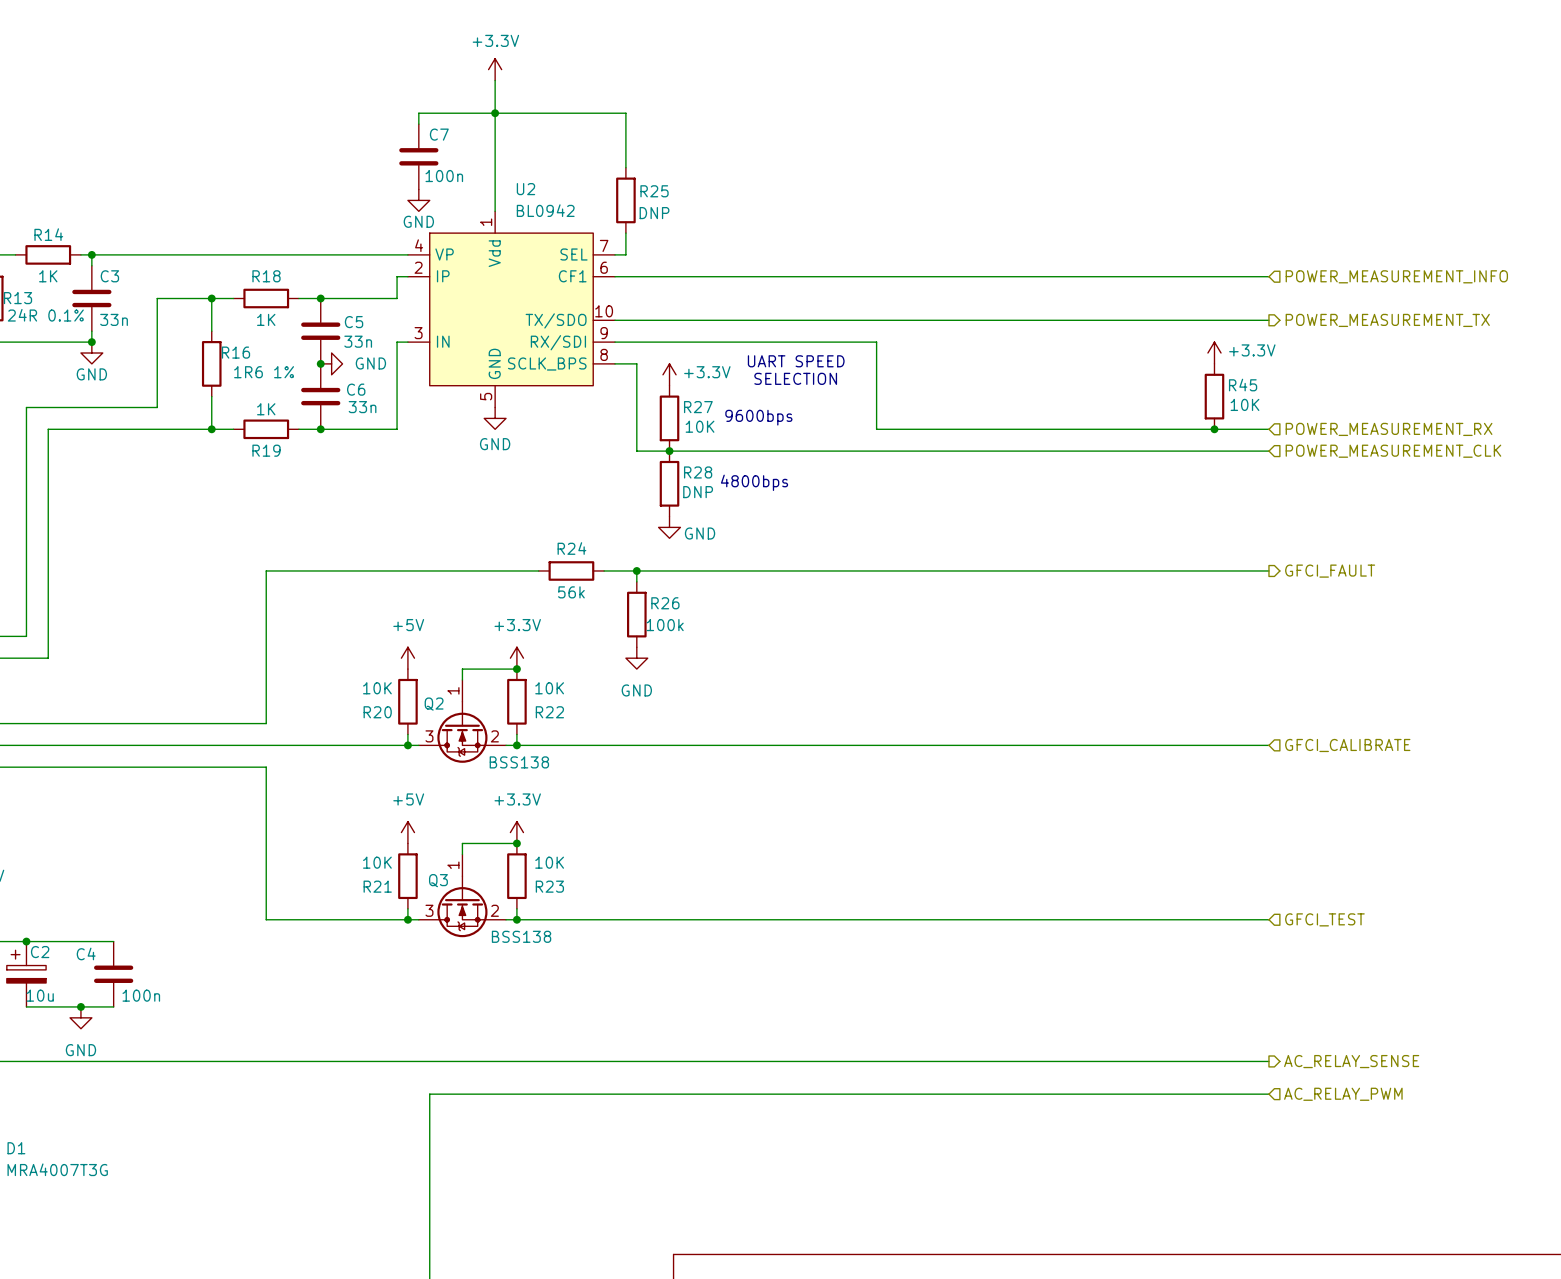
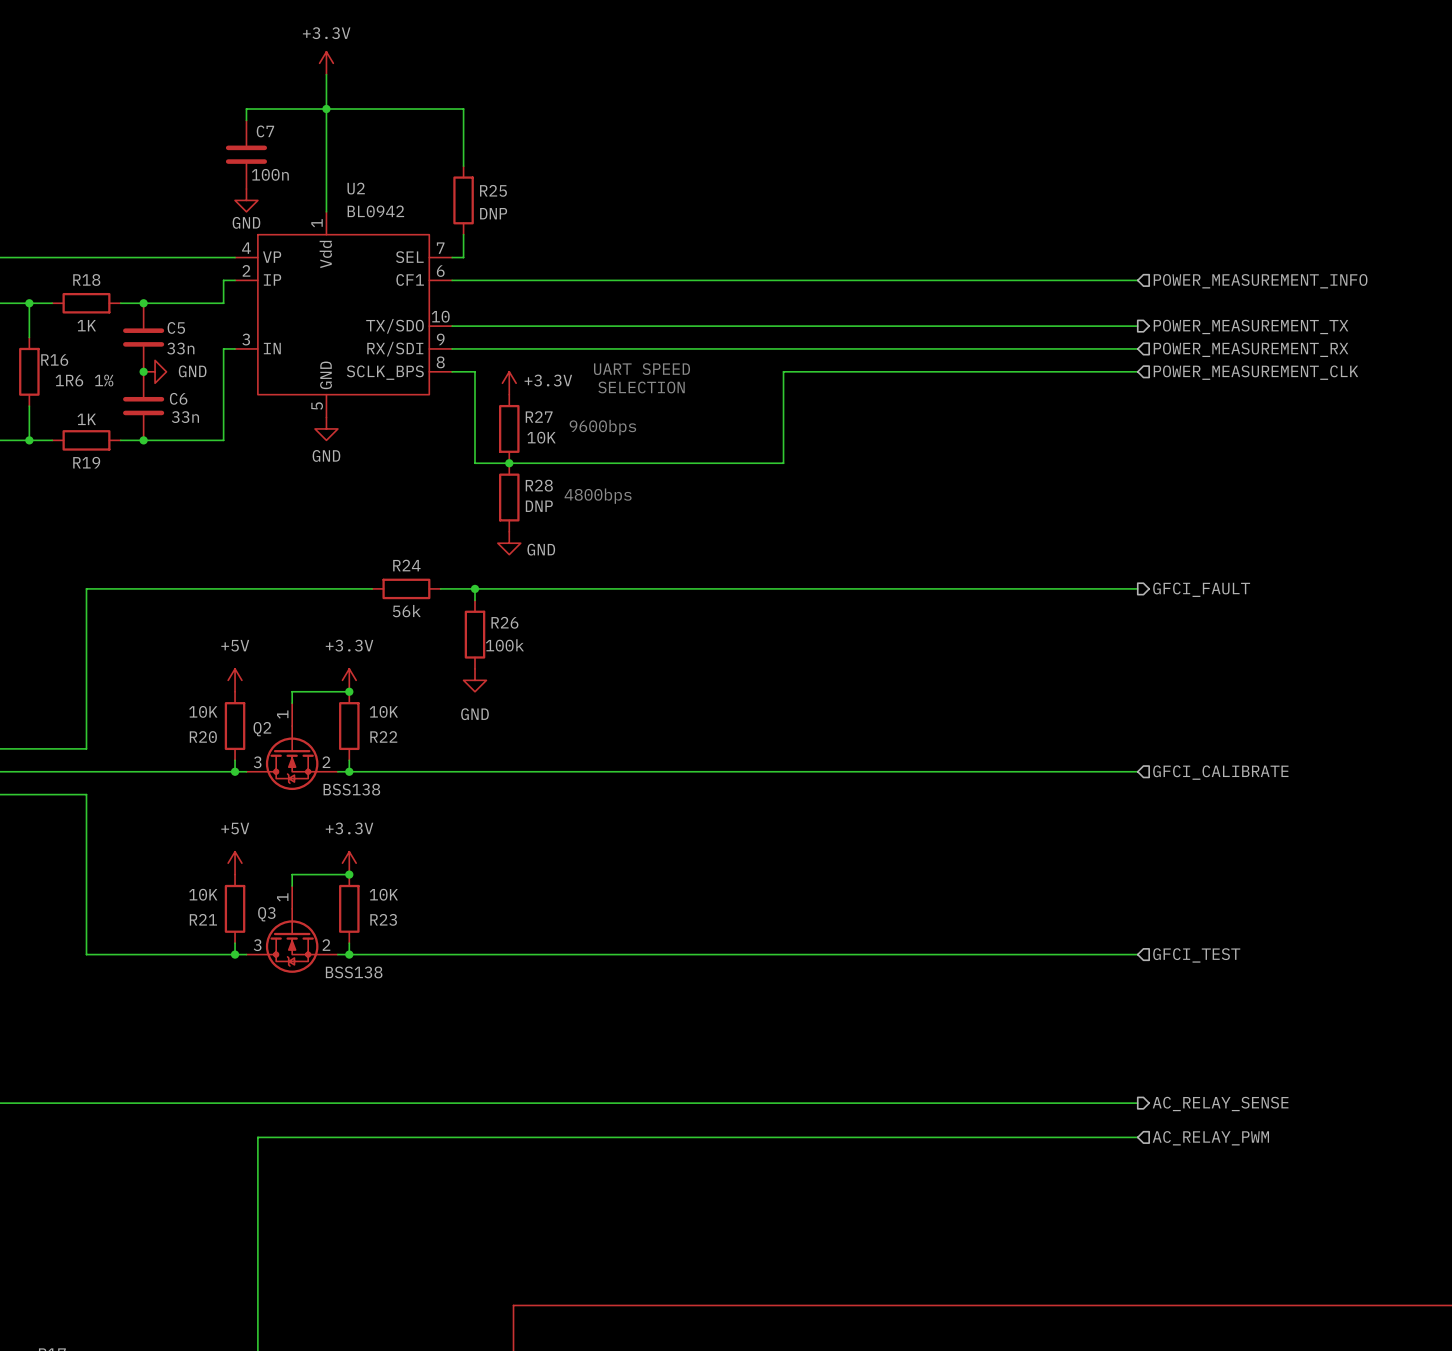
wire: (876, 342) (876, 429) (1268, 429) -> (726, 348) (1137, 348)
power symbol: +3.3V (1214, 353) -> none
R45: 10K (1214, 396) -> none
junction: (1214, 429) -> none
hierarchical label position: POWER_MEASUREMENT_RX (1389, 429) -> POWER_MEASUREMENT_RX (1251, 349)
wire: (931, 451) (1268, 451) -> (783, 463) (783, 371) (1137, 371)
hierarchical label position: POWER_MEASUREMENT_CLK (1393, 451) -> POWER_MEASUREMENT_CLK (1255, 372)

